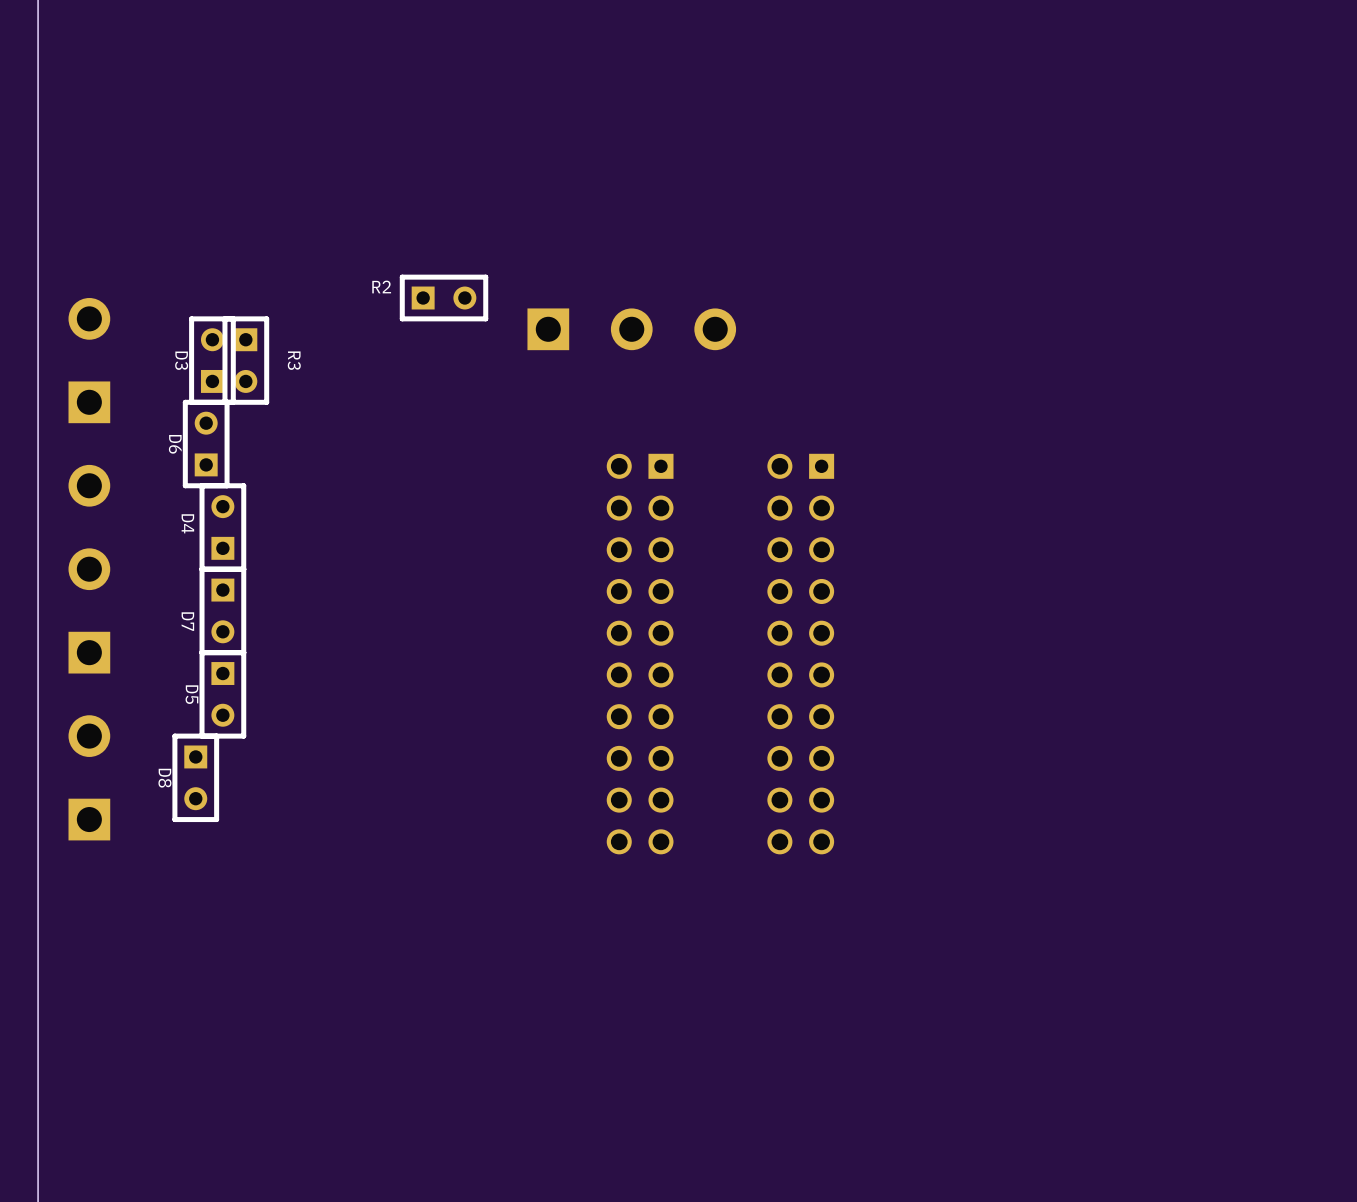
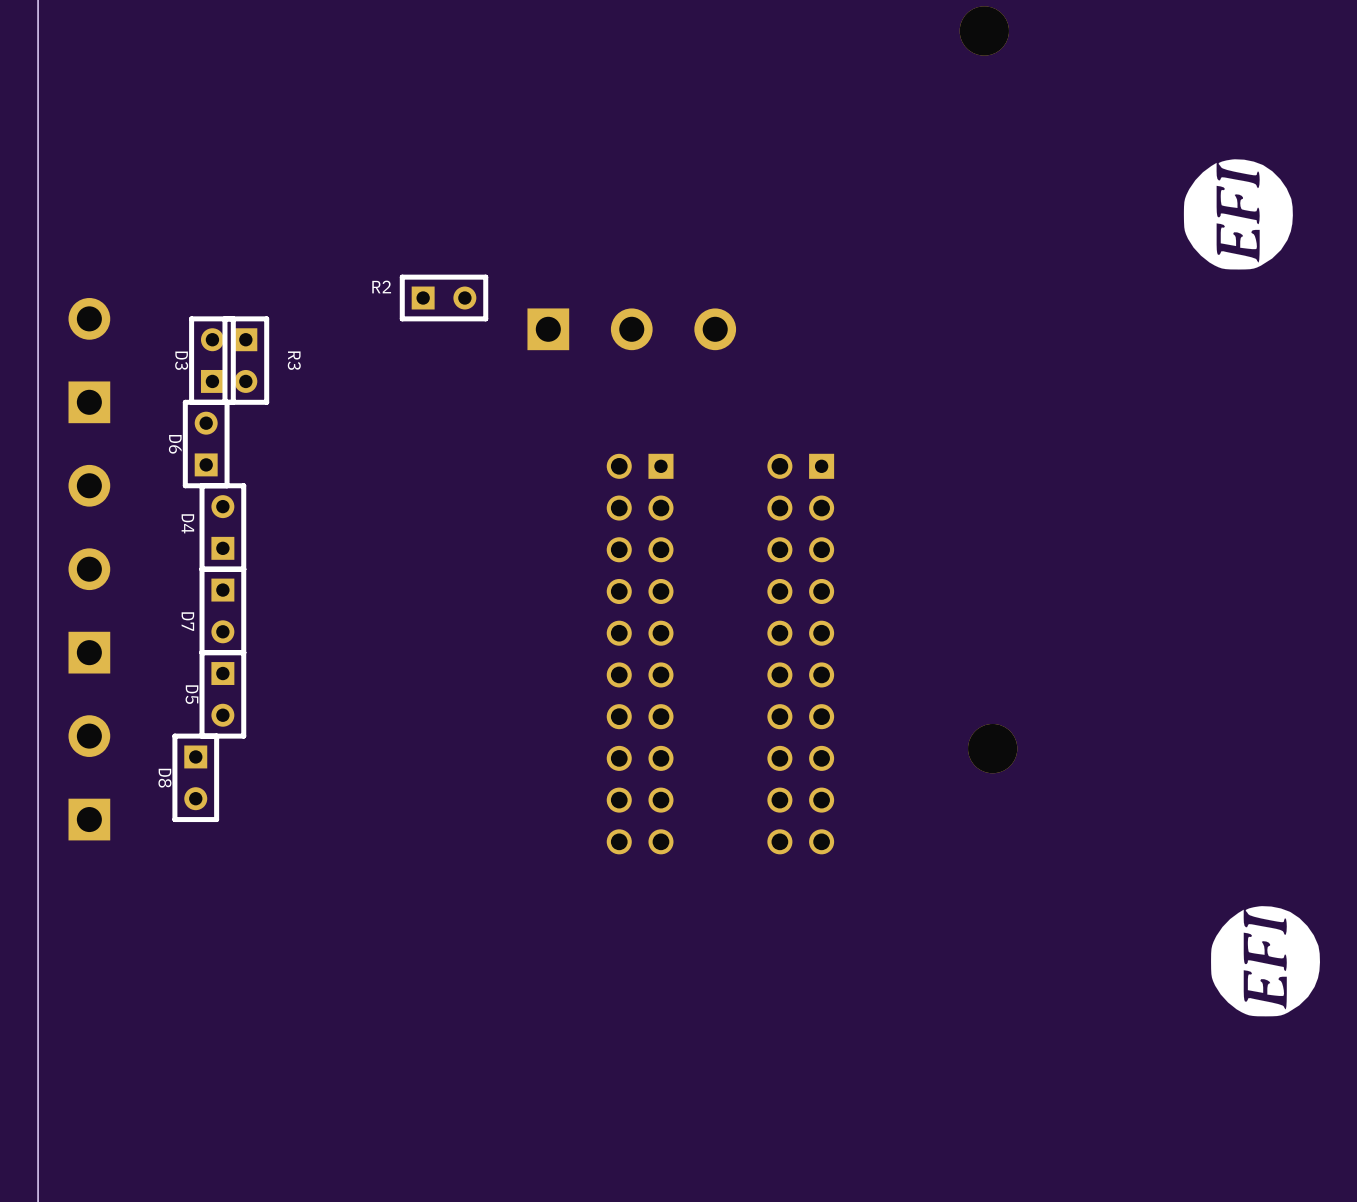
part: none -> (984, 30)
drawing: none -> [1183, 159, 1293, 270]
part: none -> (992, 748)
drawing: none -> [1211, 906, 1321, 1017]

